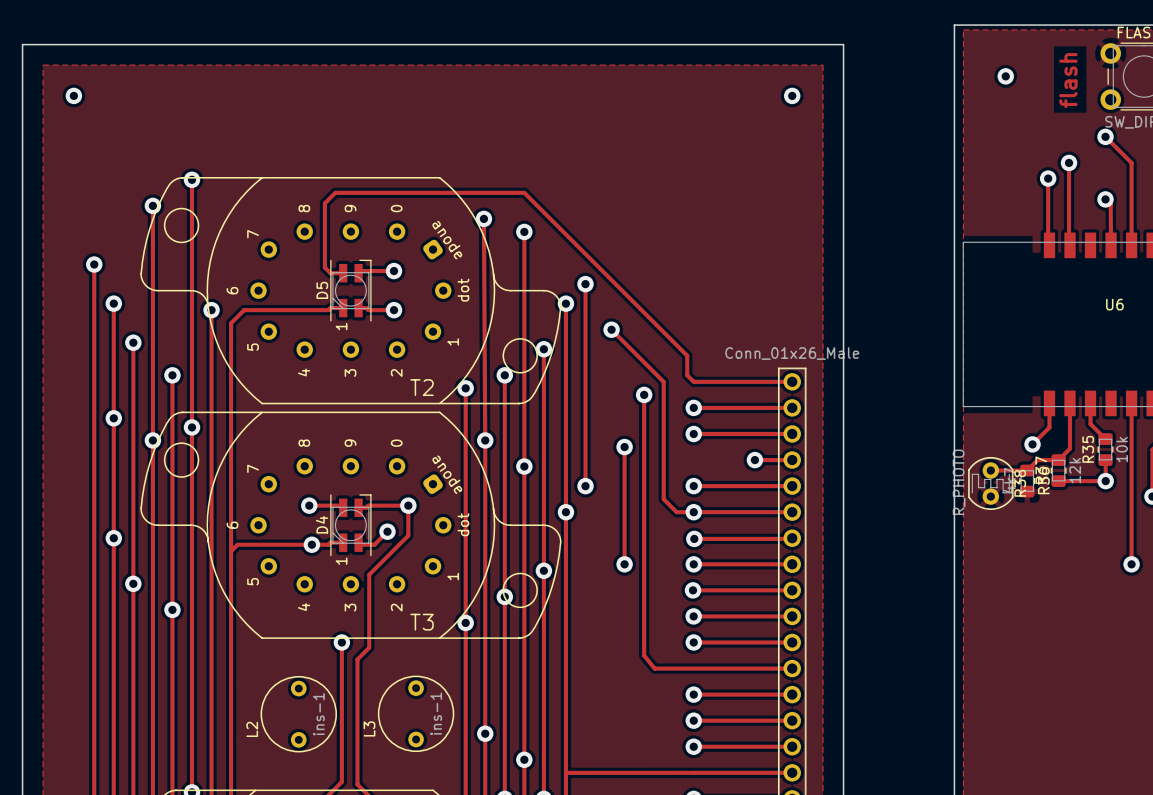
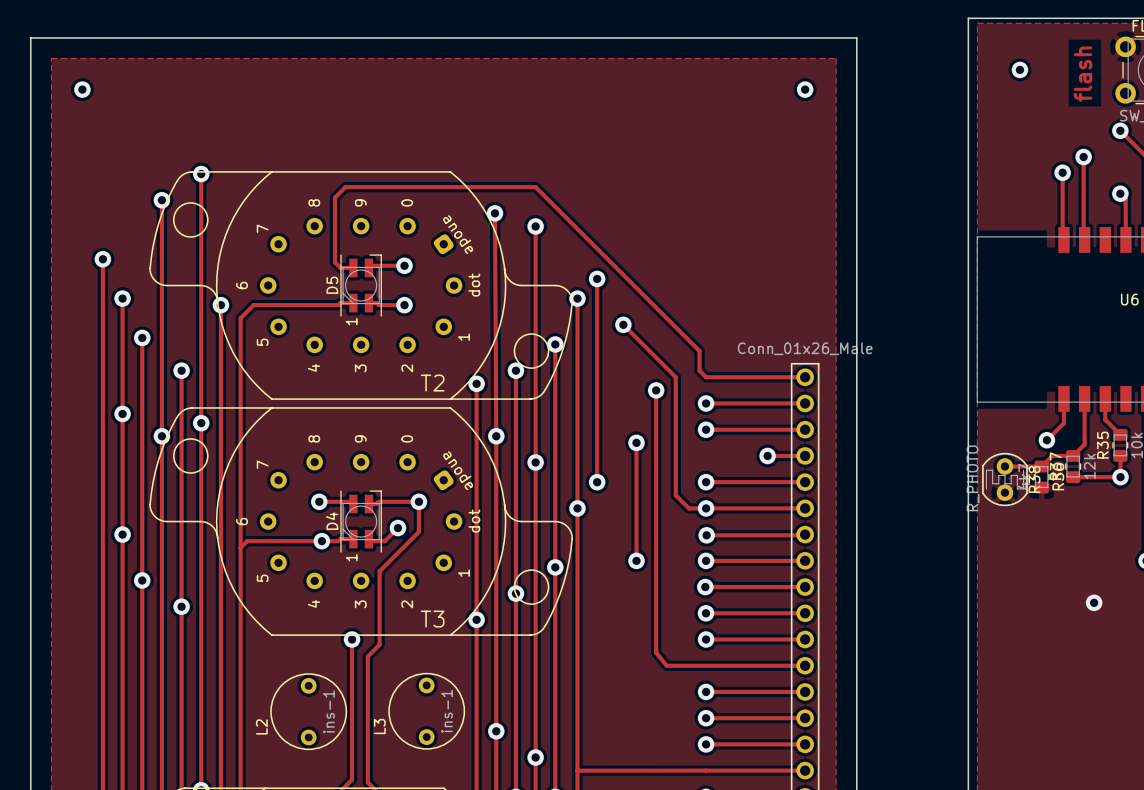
via: none -> (1094, 602)

